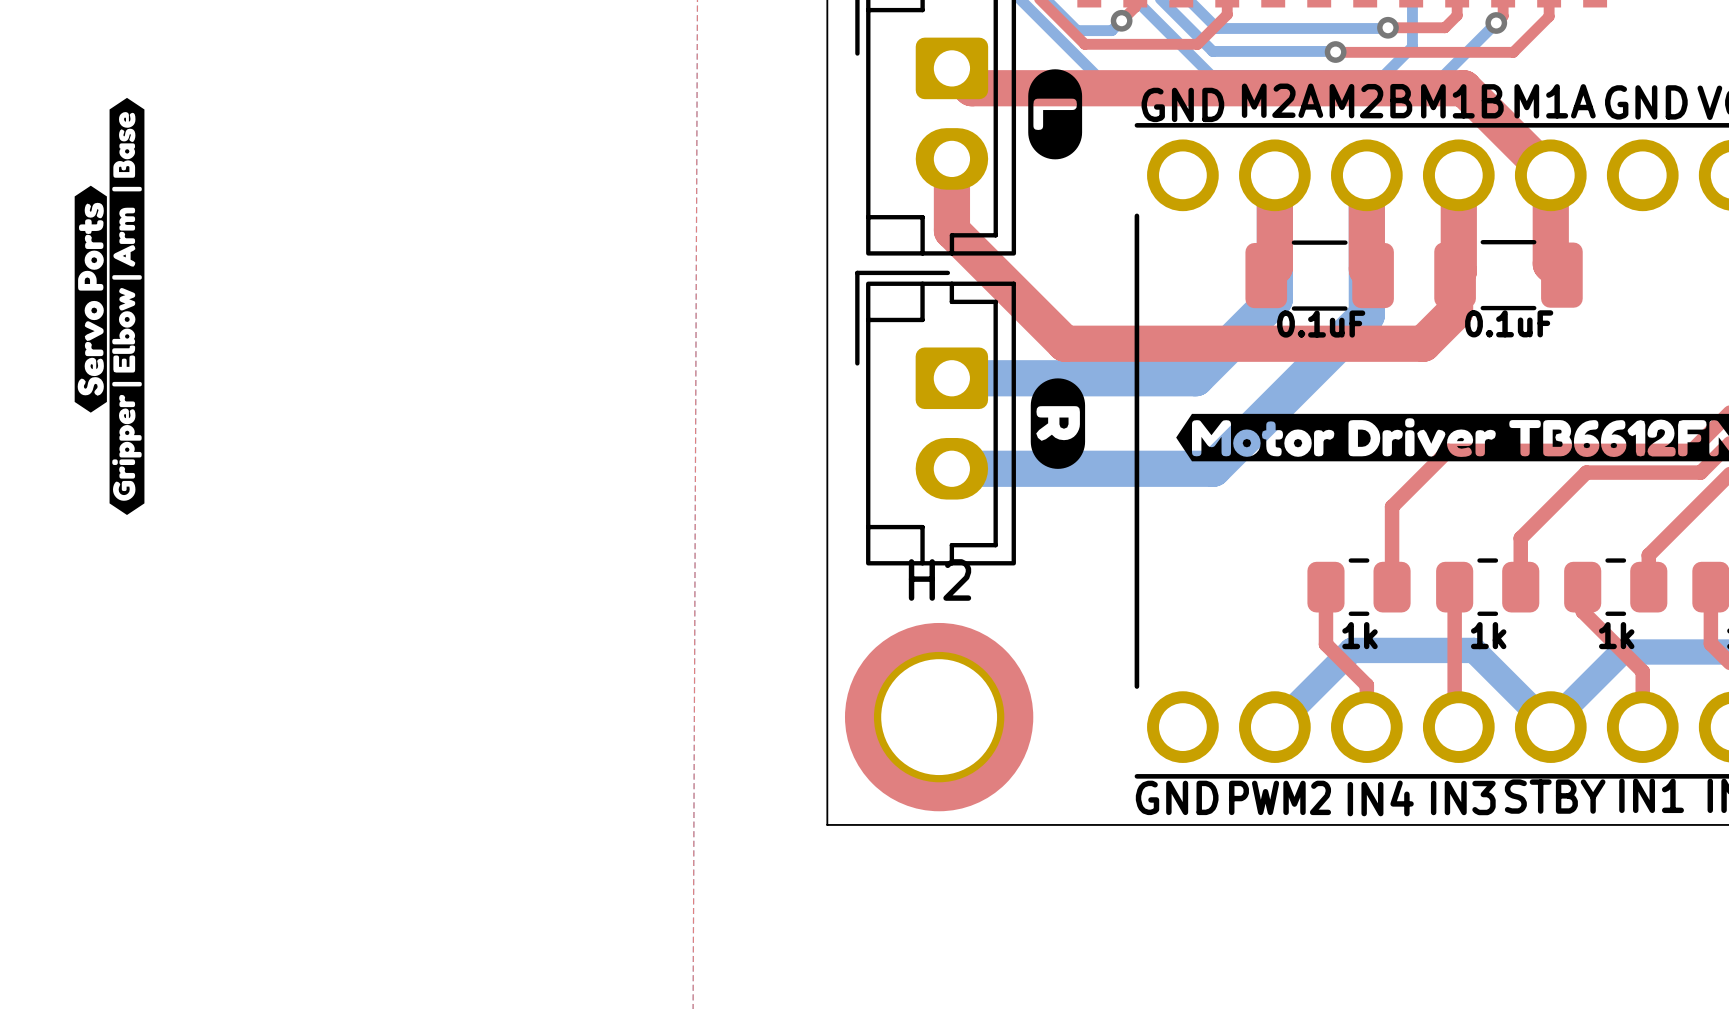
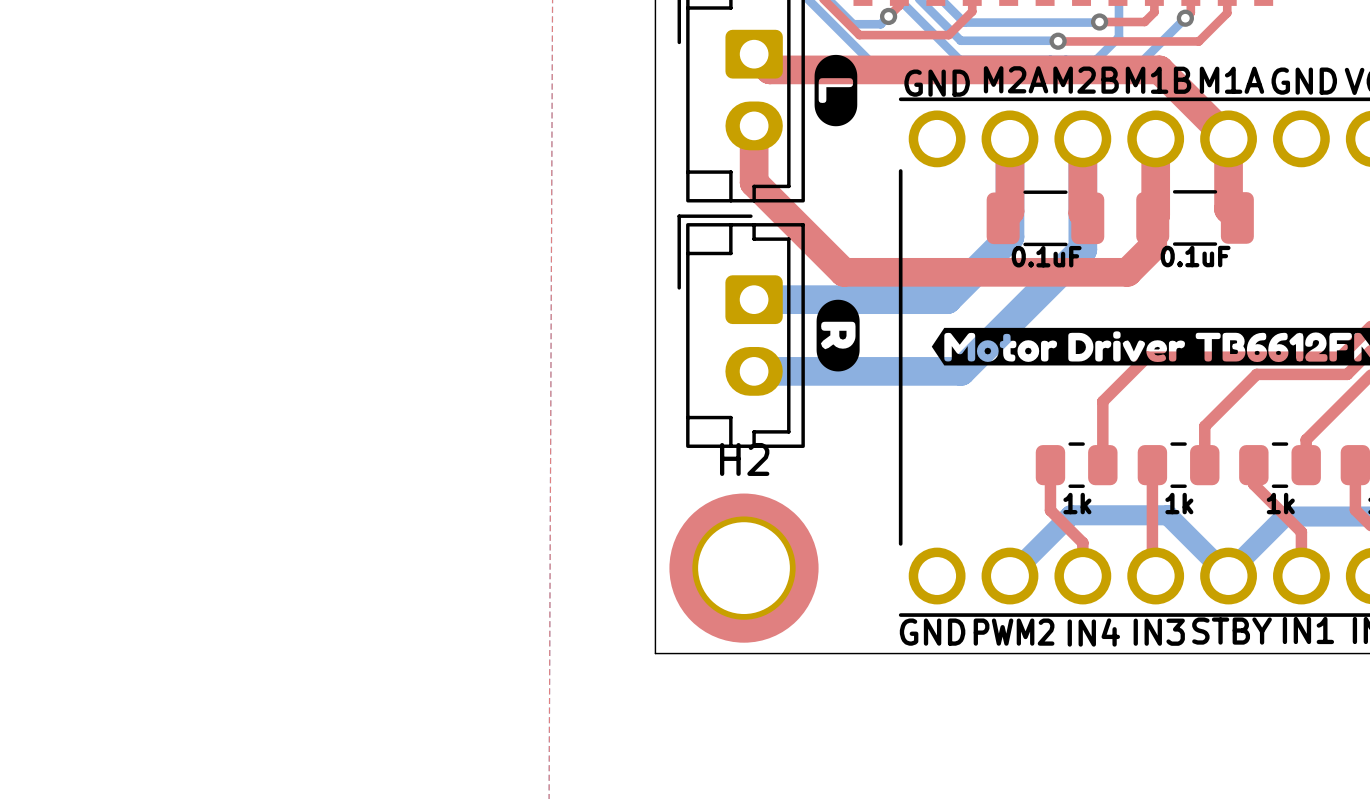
drawing: [74, 97, 145, 515] -> none

